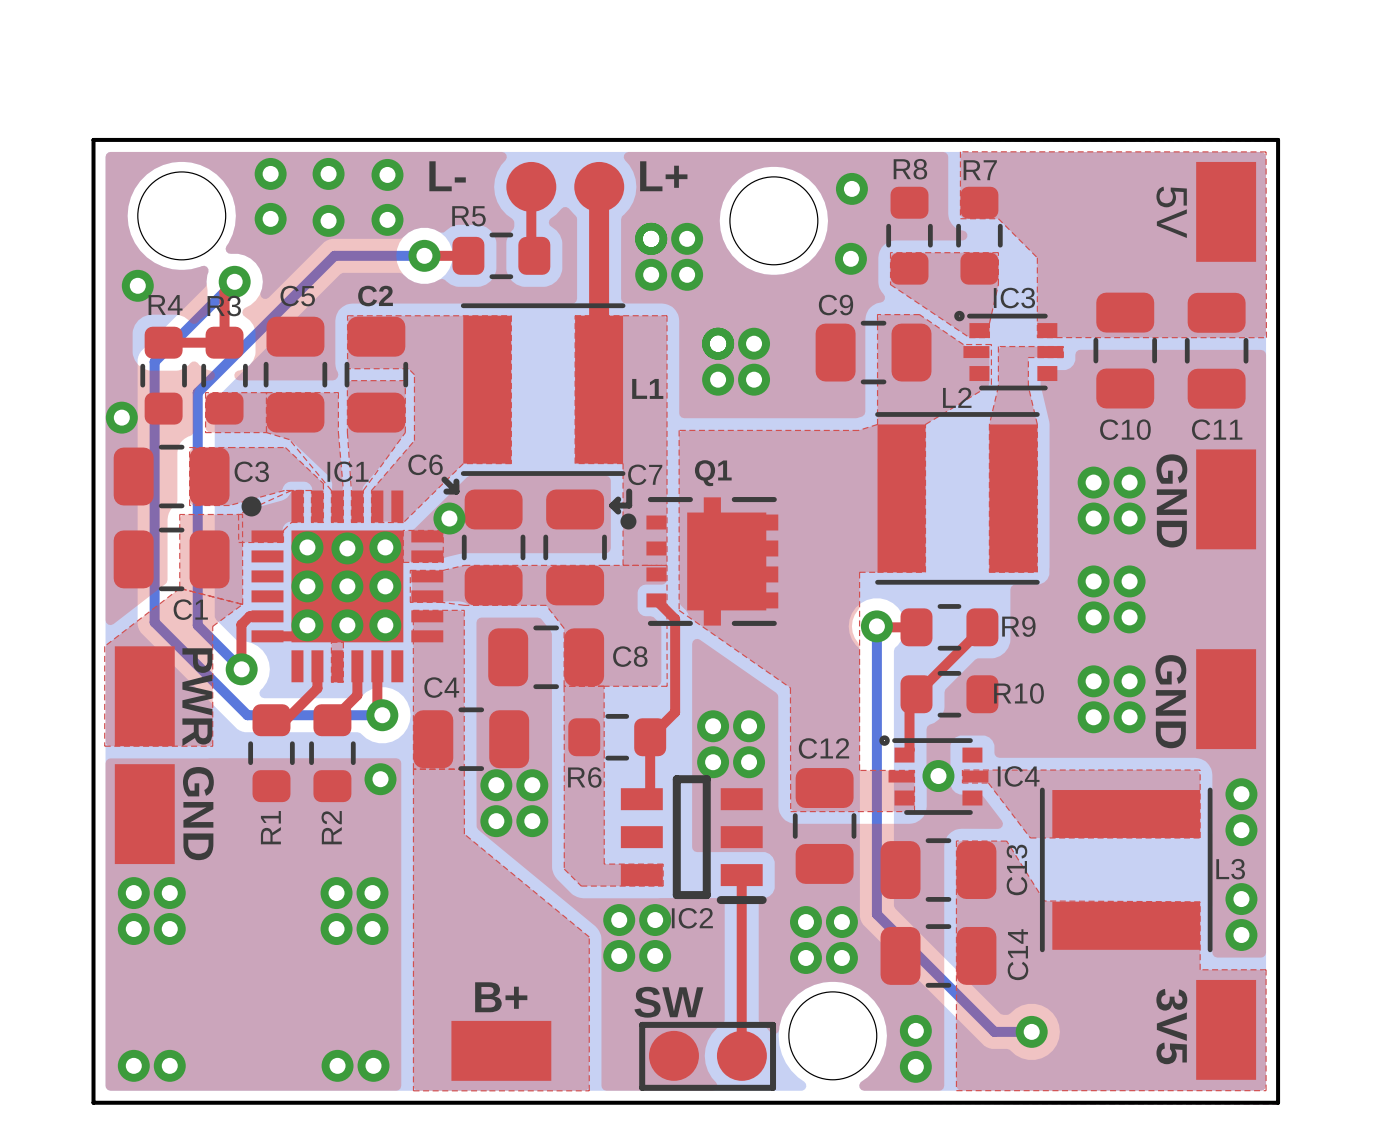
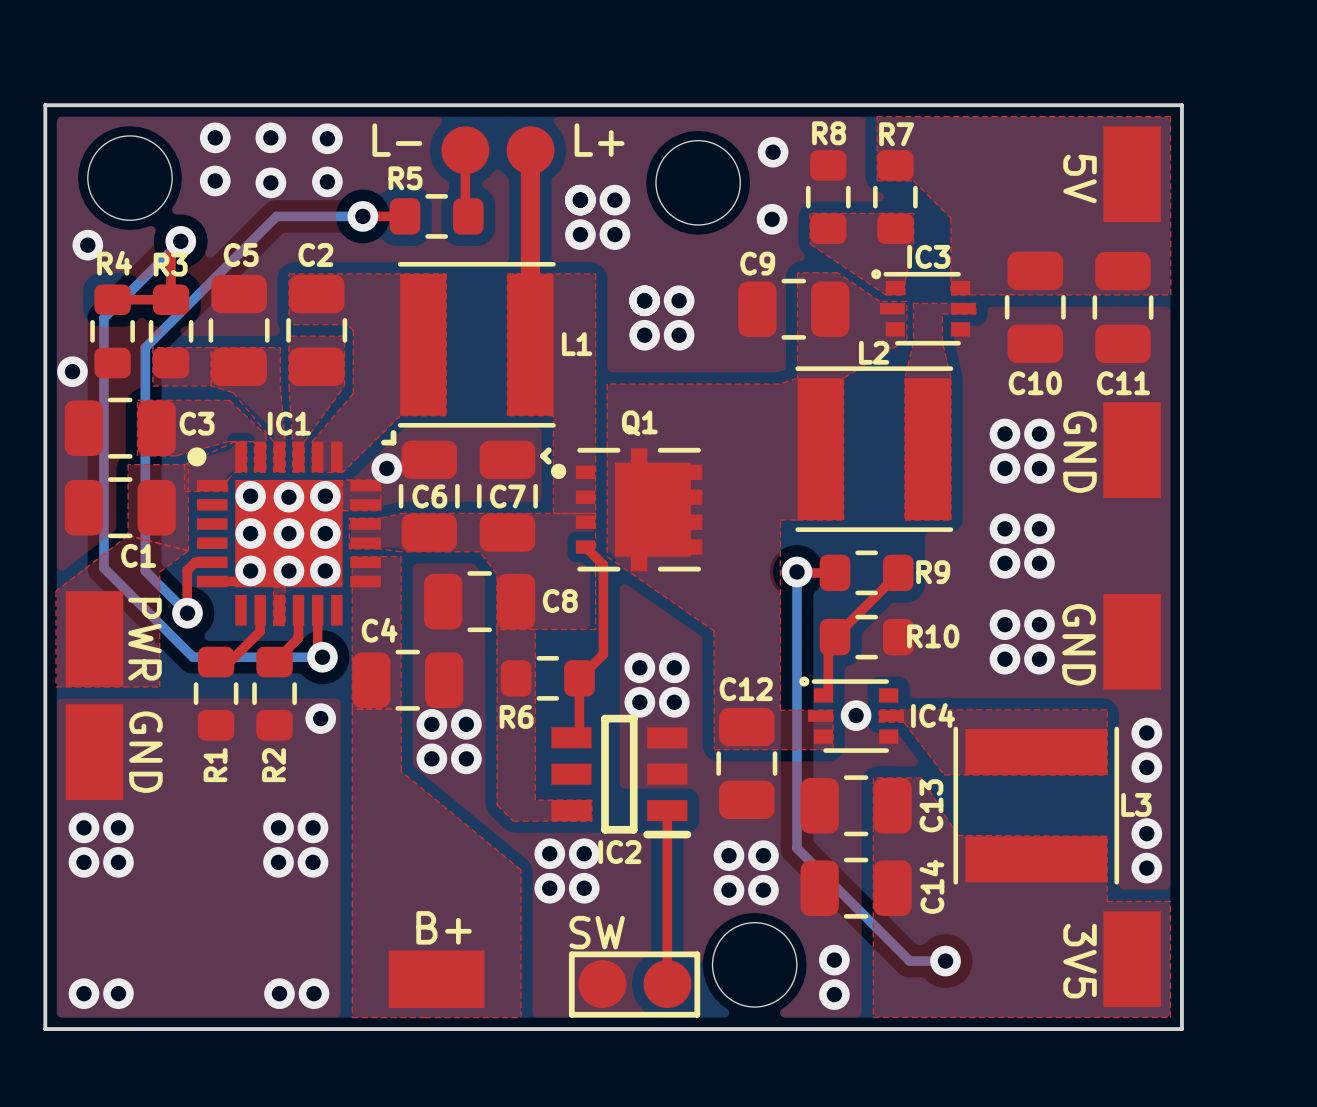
C6 name position: C6 (425, 464) -> C6 (429, 496)
C7 name position: C7 (645, 474) -> C7 (507, 496)
line: (444, 479) (456, 491) -> none
line: (629, 491) (629, 505) (612, 505) -> none

